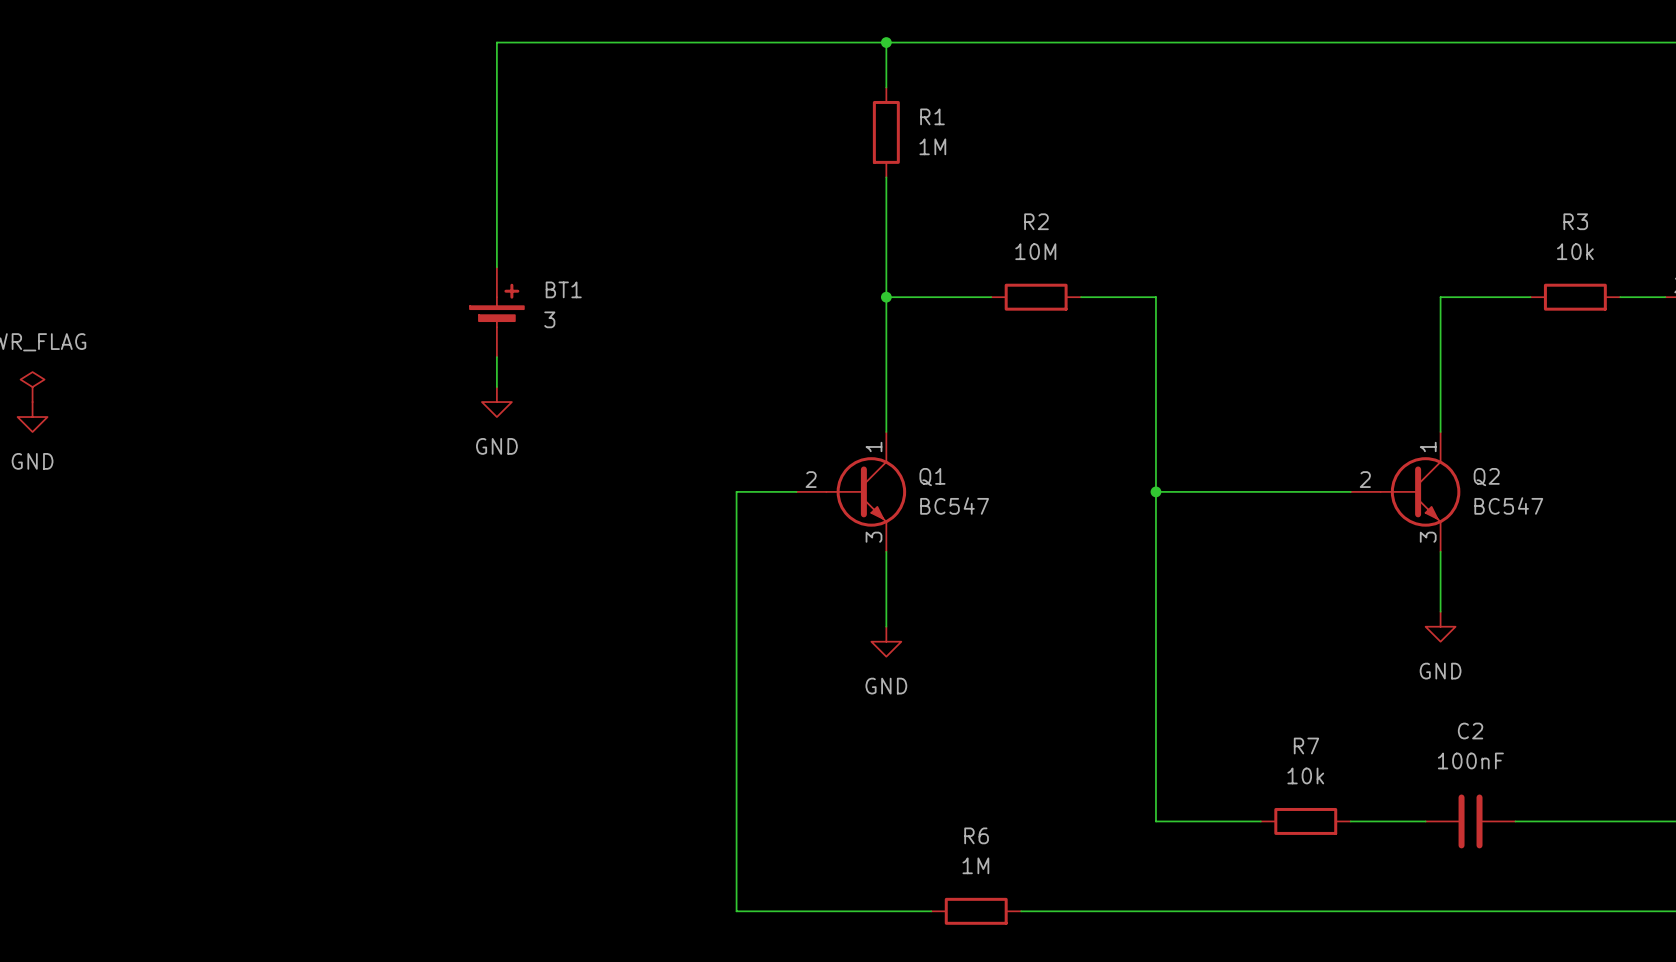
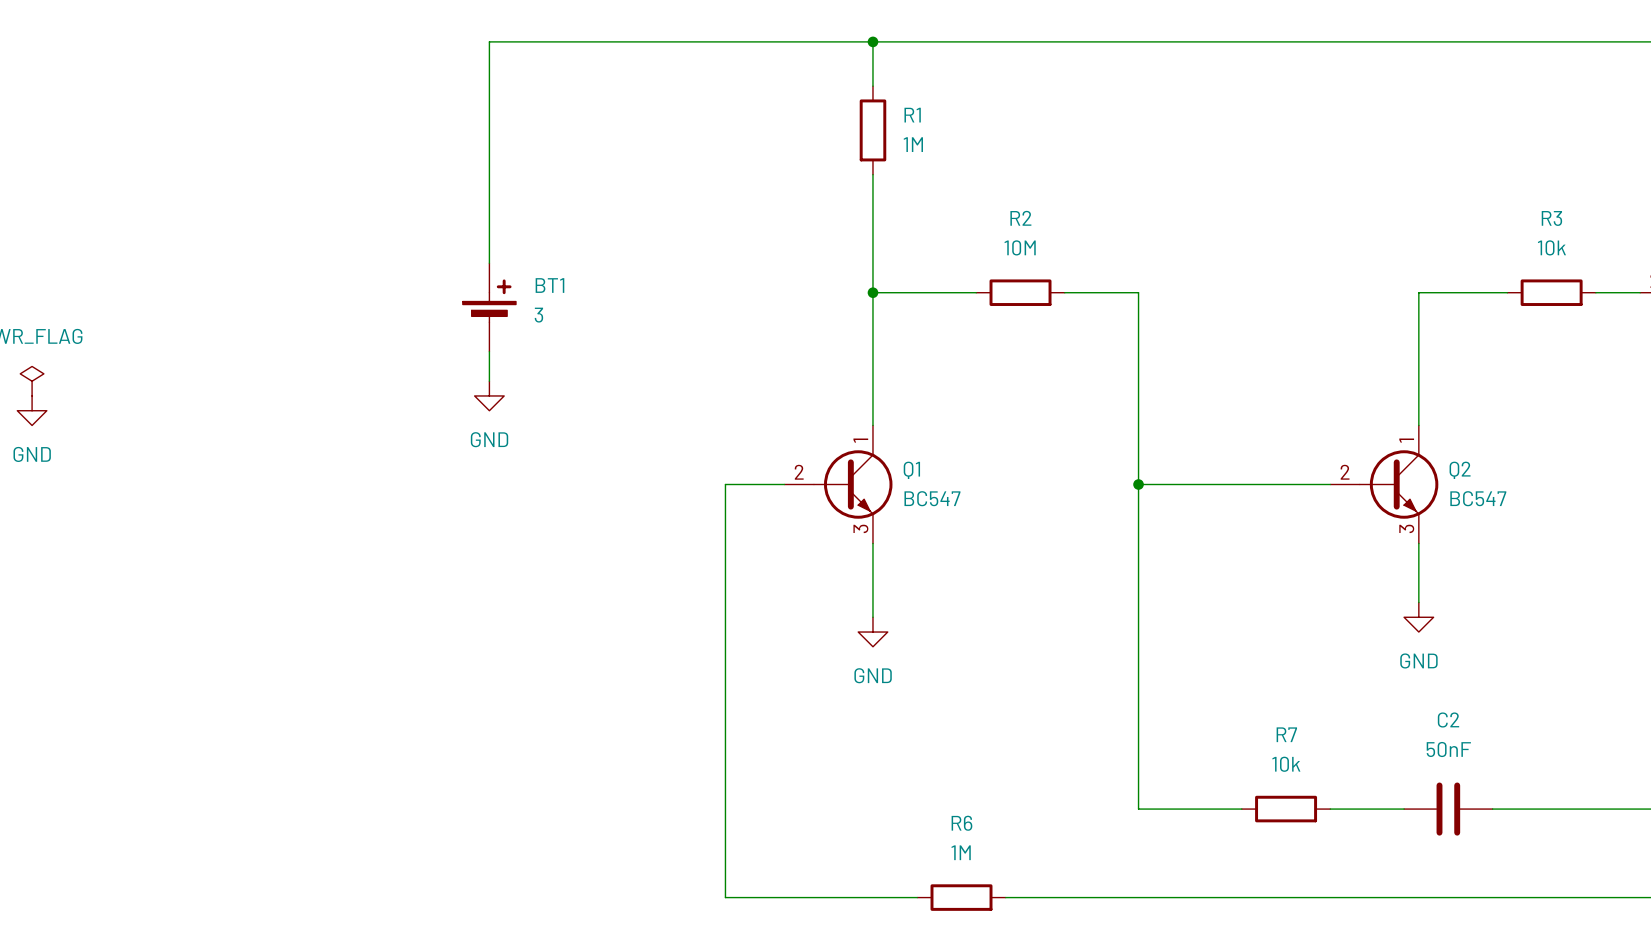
C2 value: 100nF (1470, 760) -> 50nF (1448, 749)

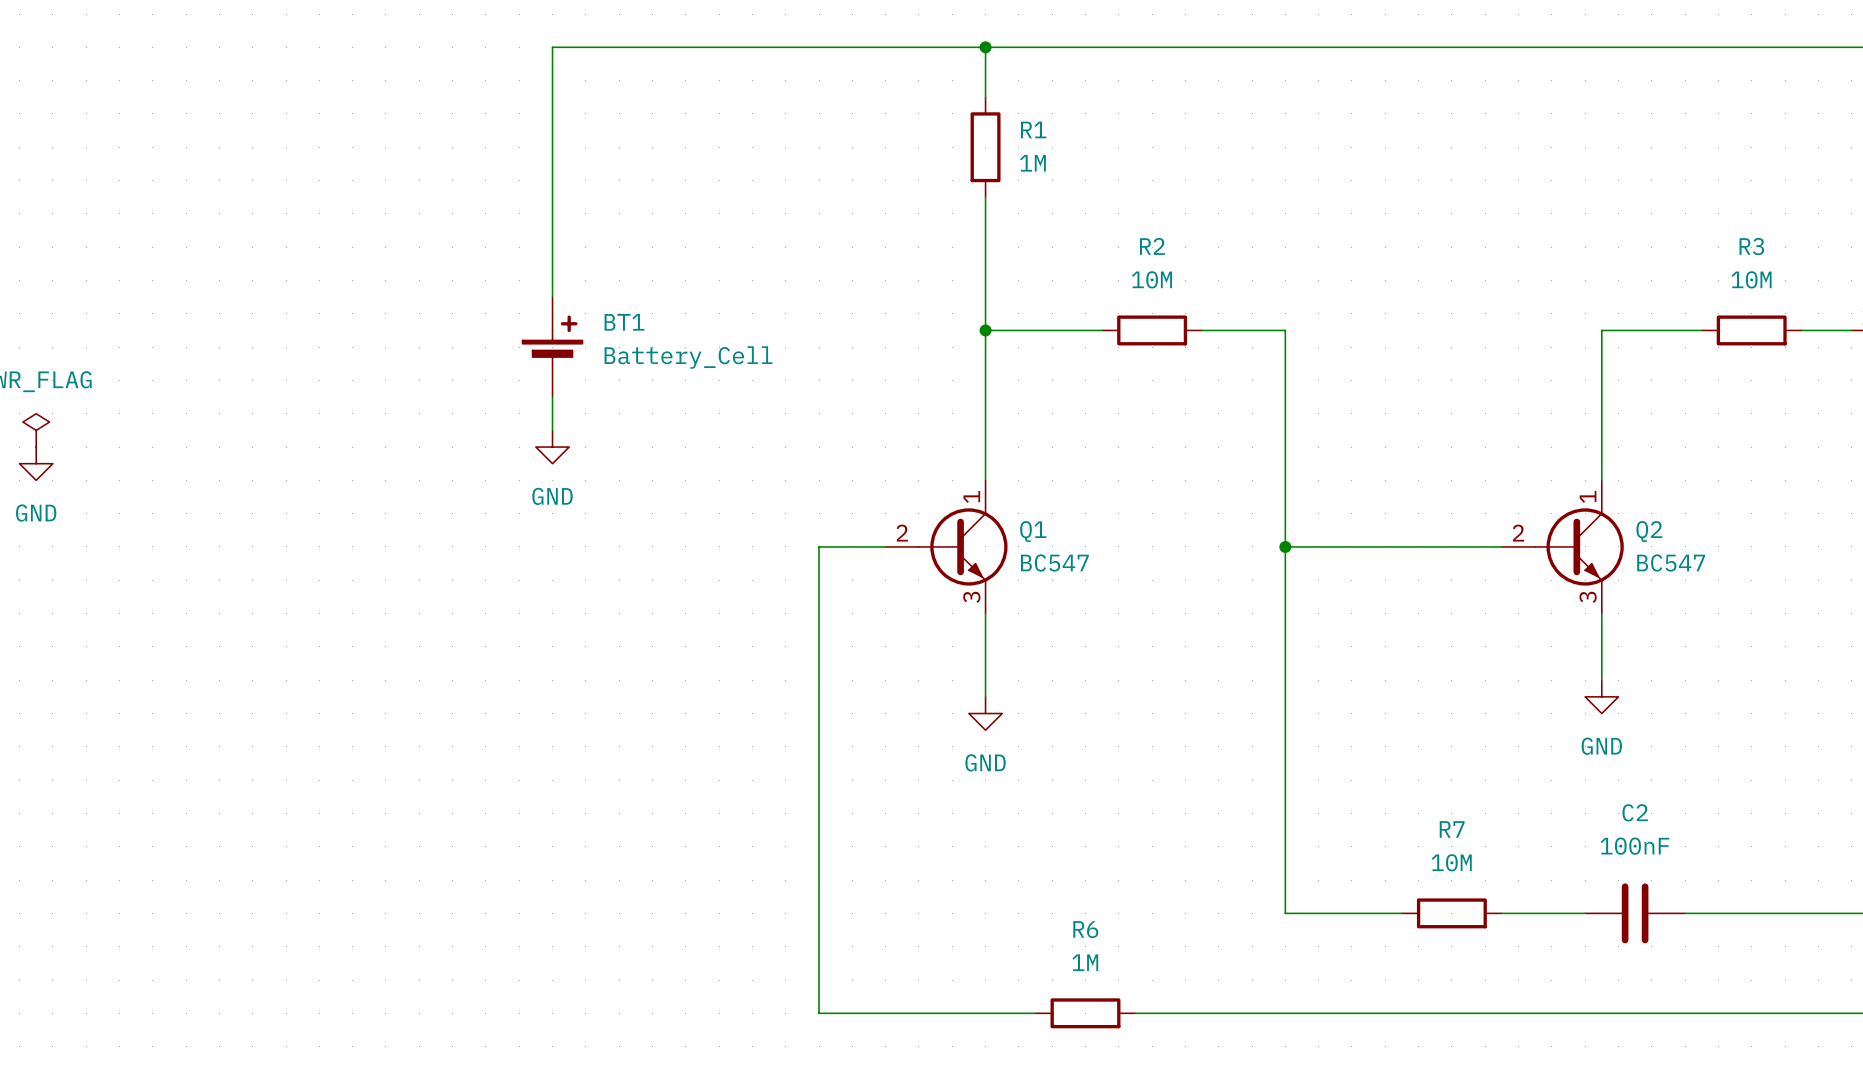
R3 value: 10k (1551, 247) -> 10M (1751, 279)
BT1 value: 3 (538, 315) -> Battery_Cell (688, 357)
C2 value: 50nF (1448, 749) -> 100nF (1634, 846)
R7 value: 10k (1286, 764) -> 10M (1451, 862)

